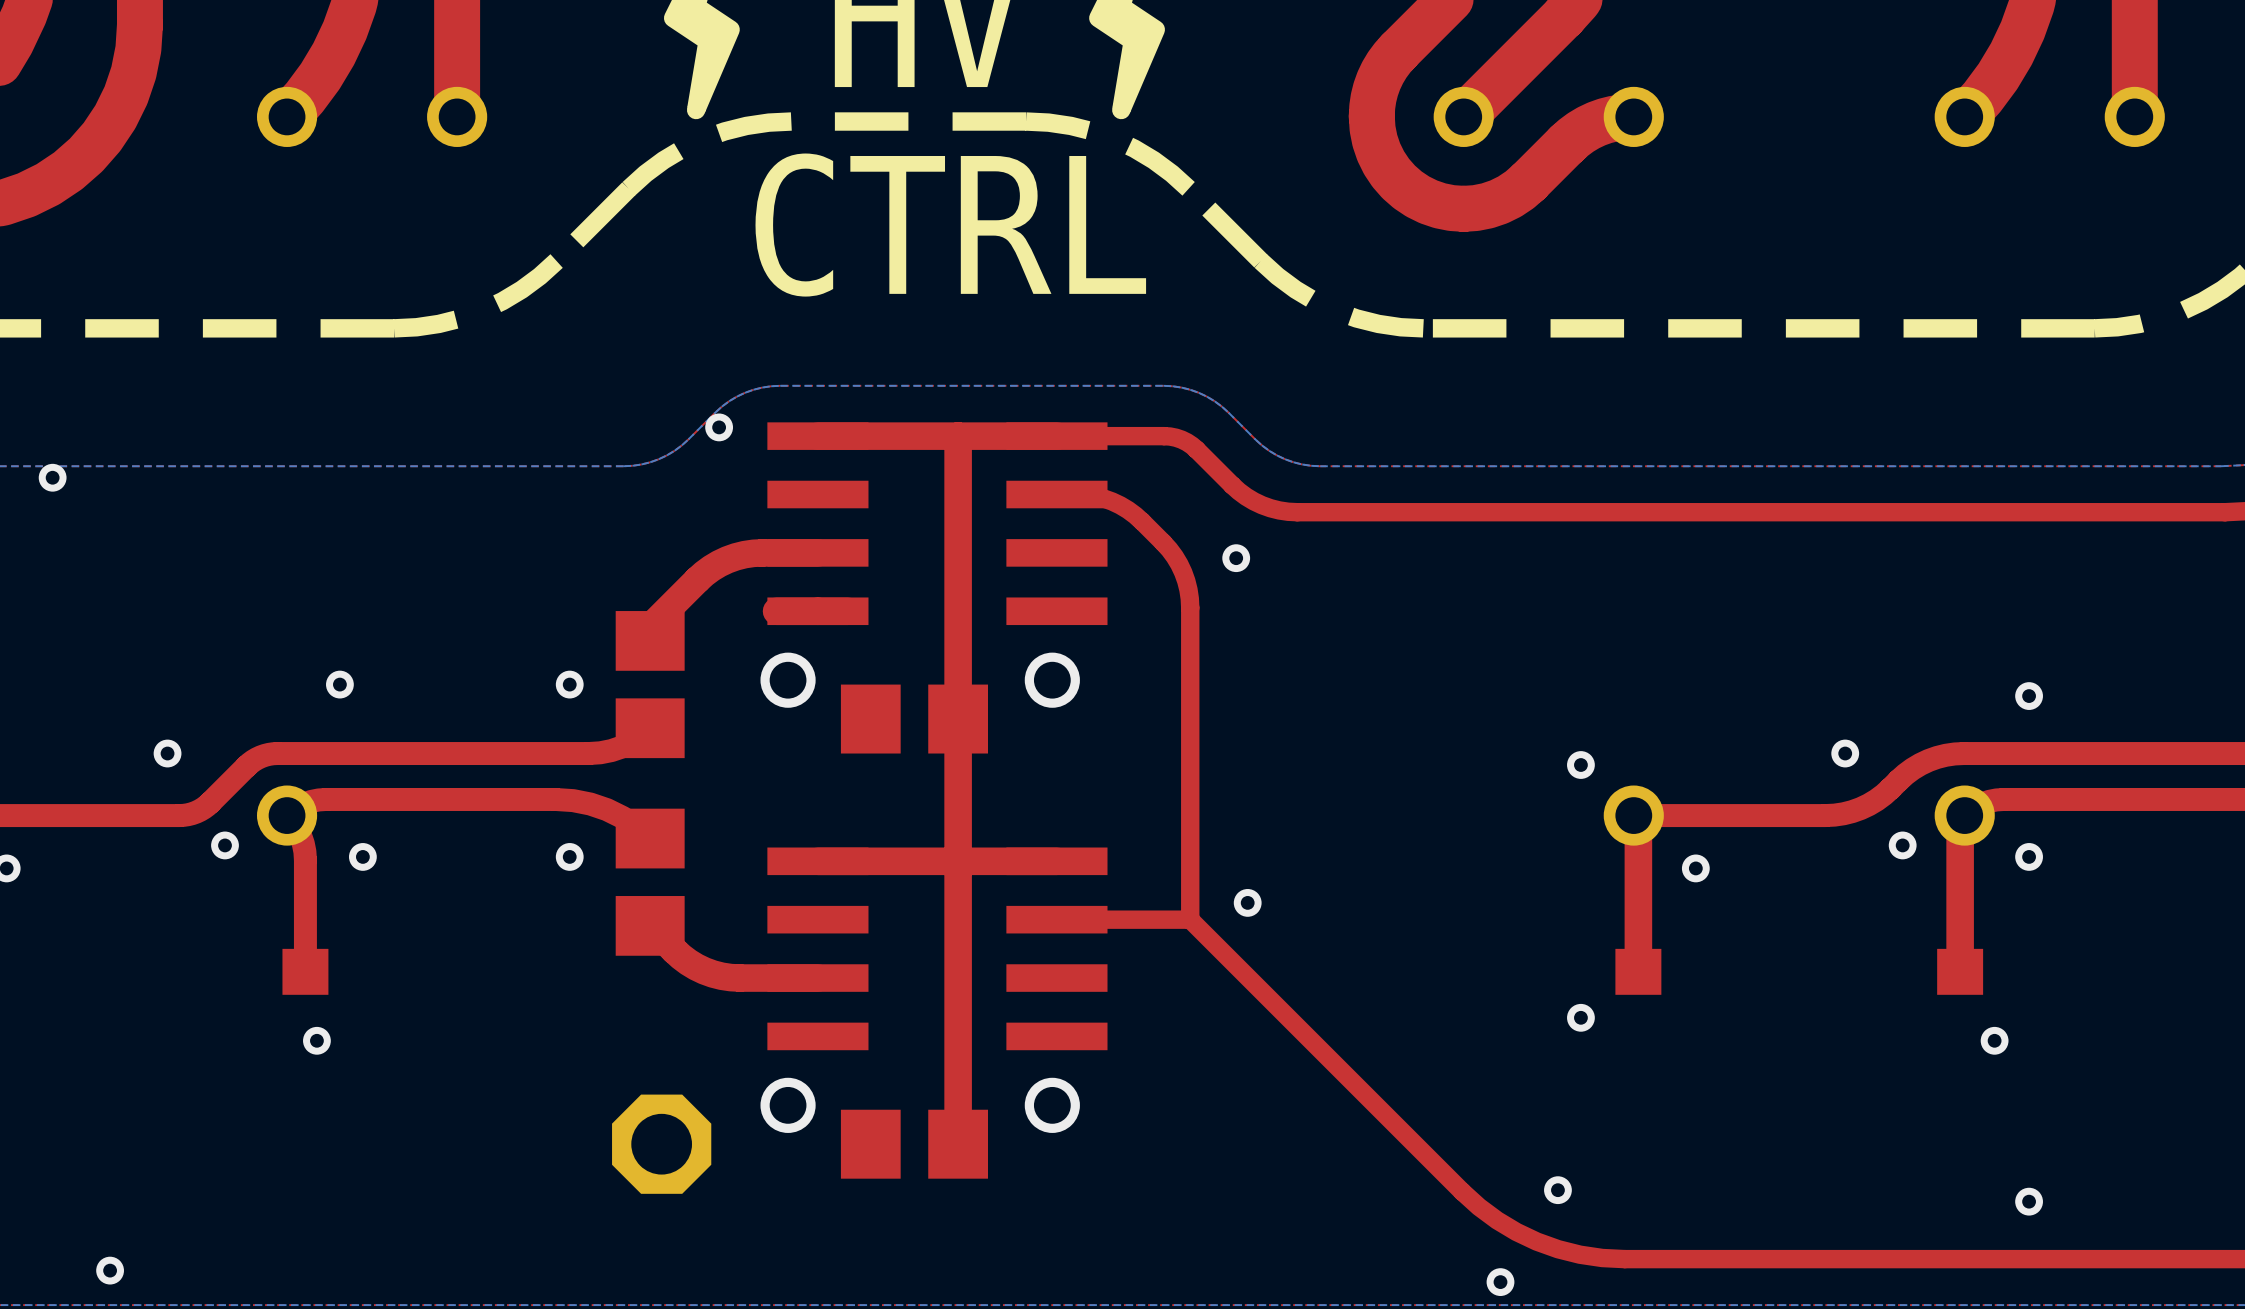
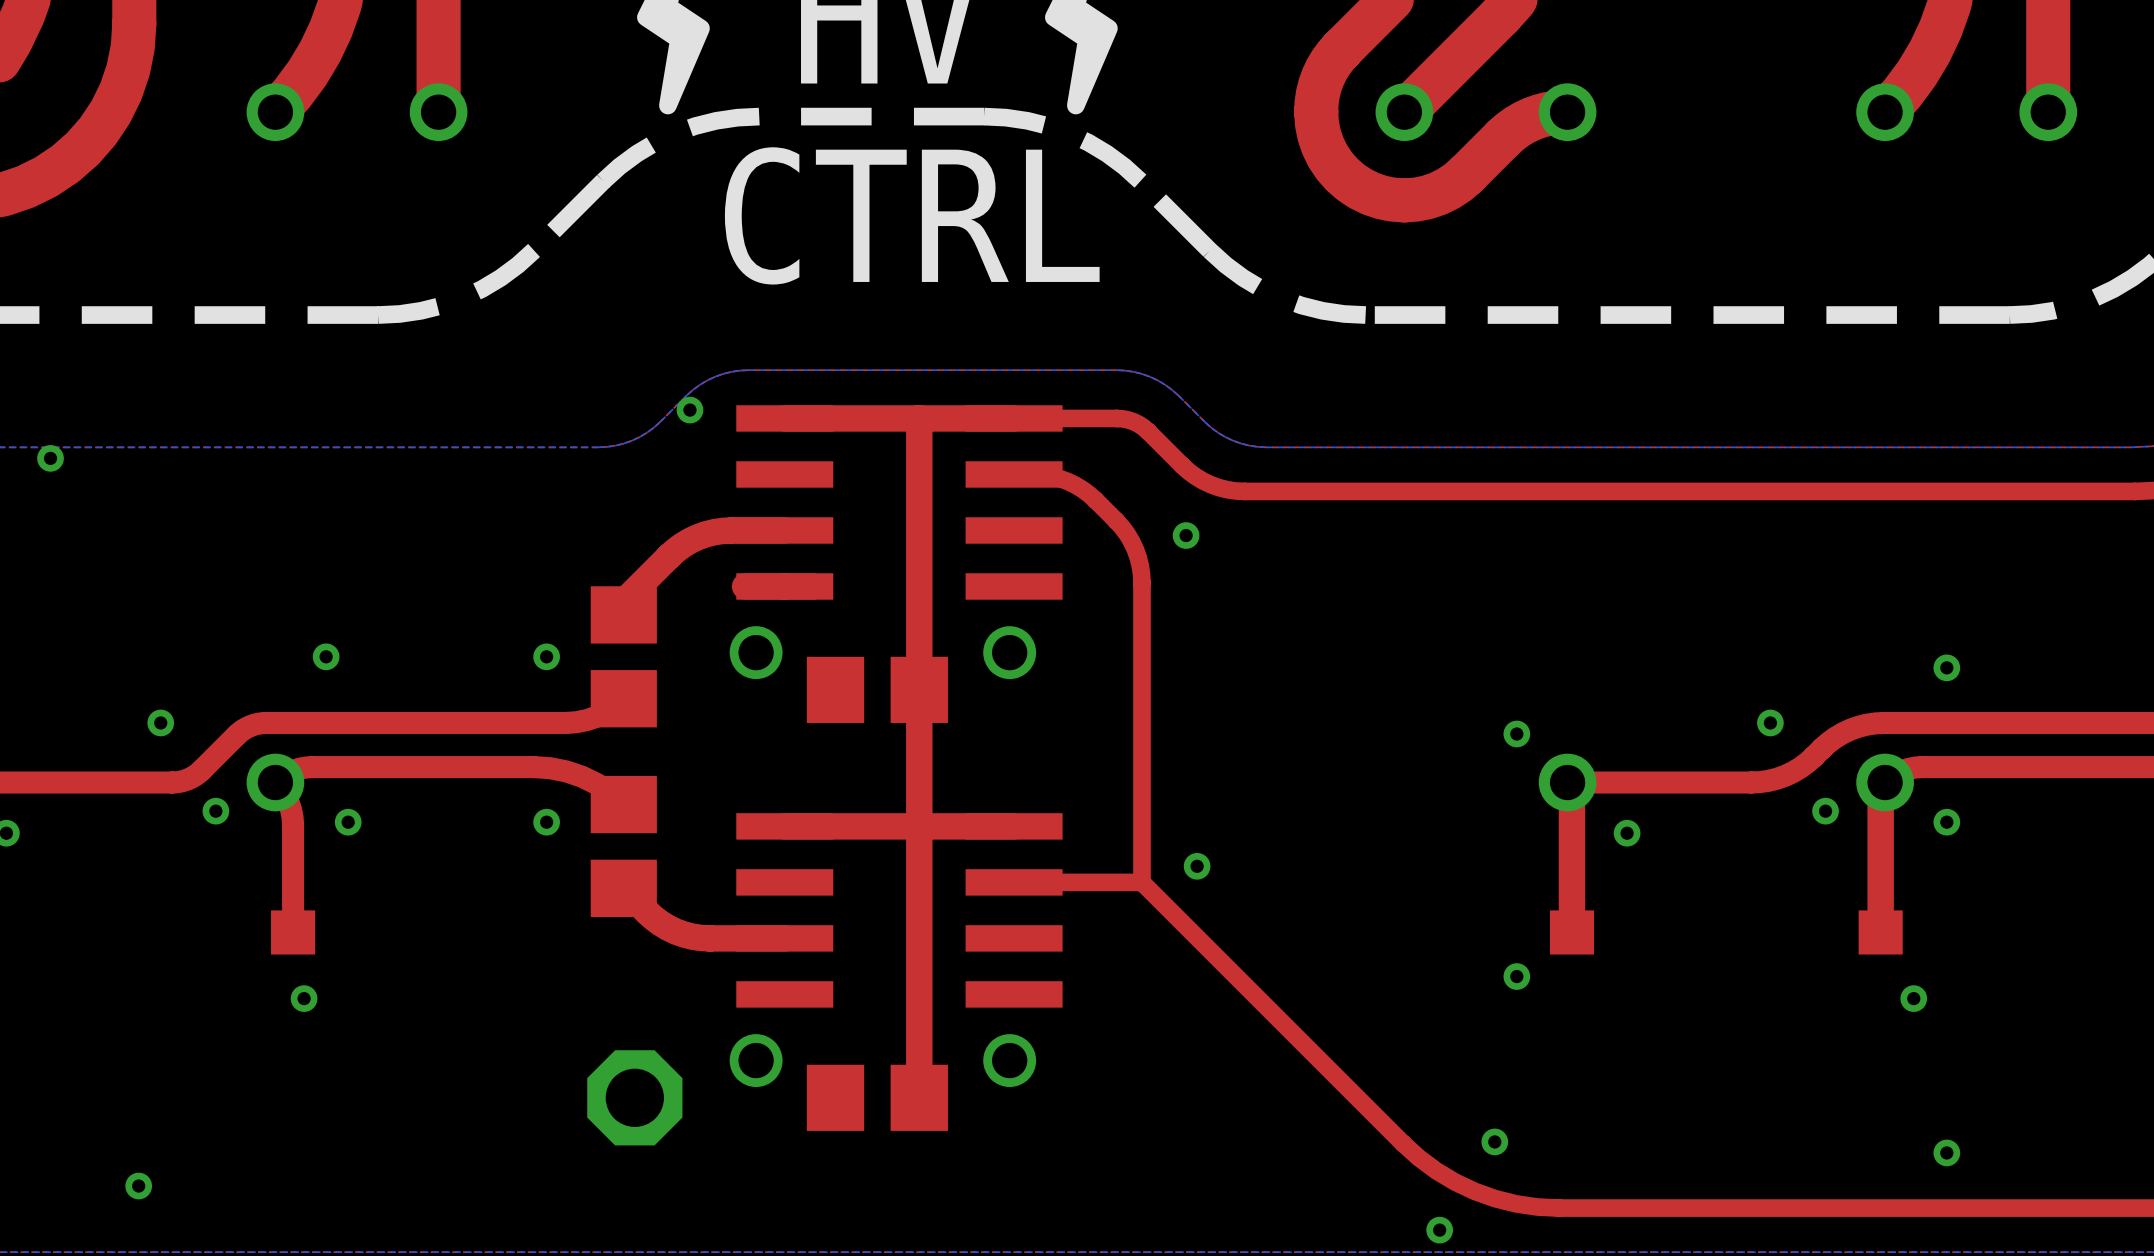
via position: (110, 1270) -> (138, 1186)

